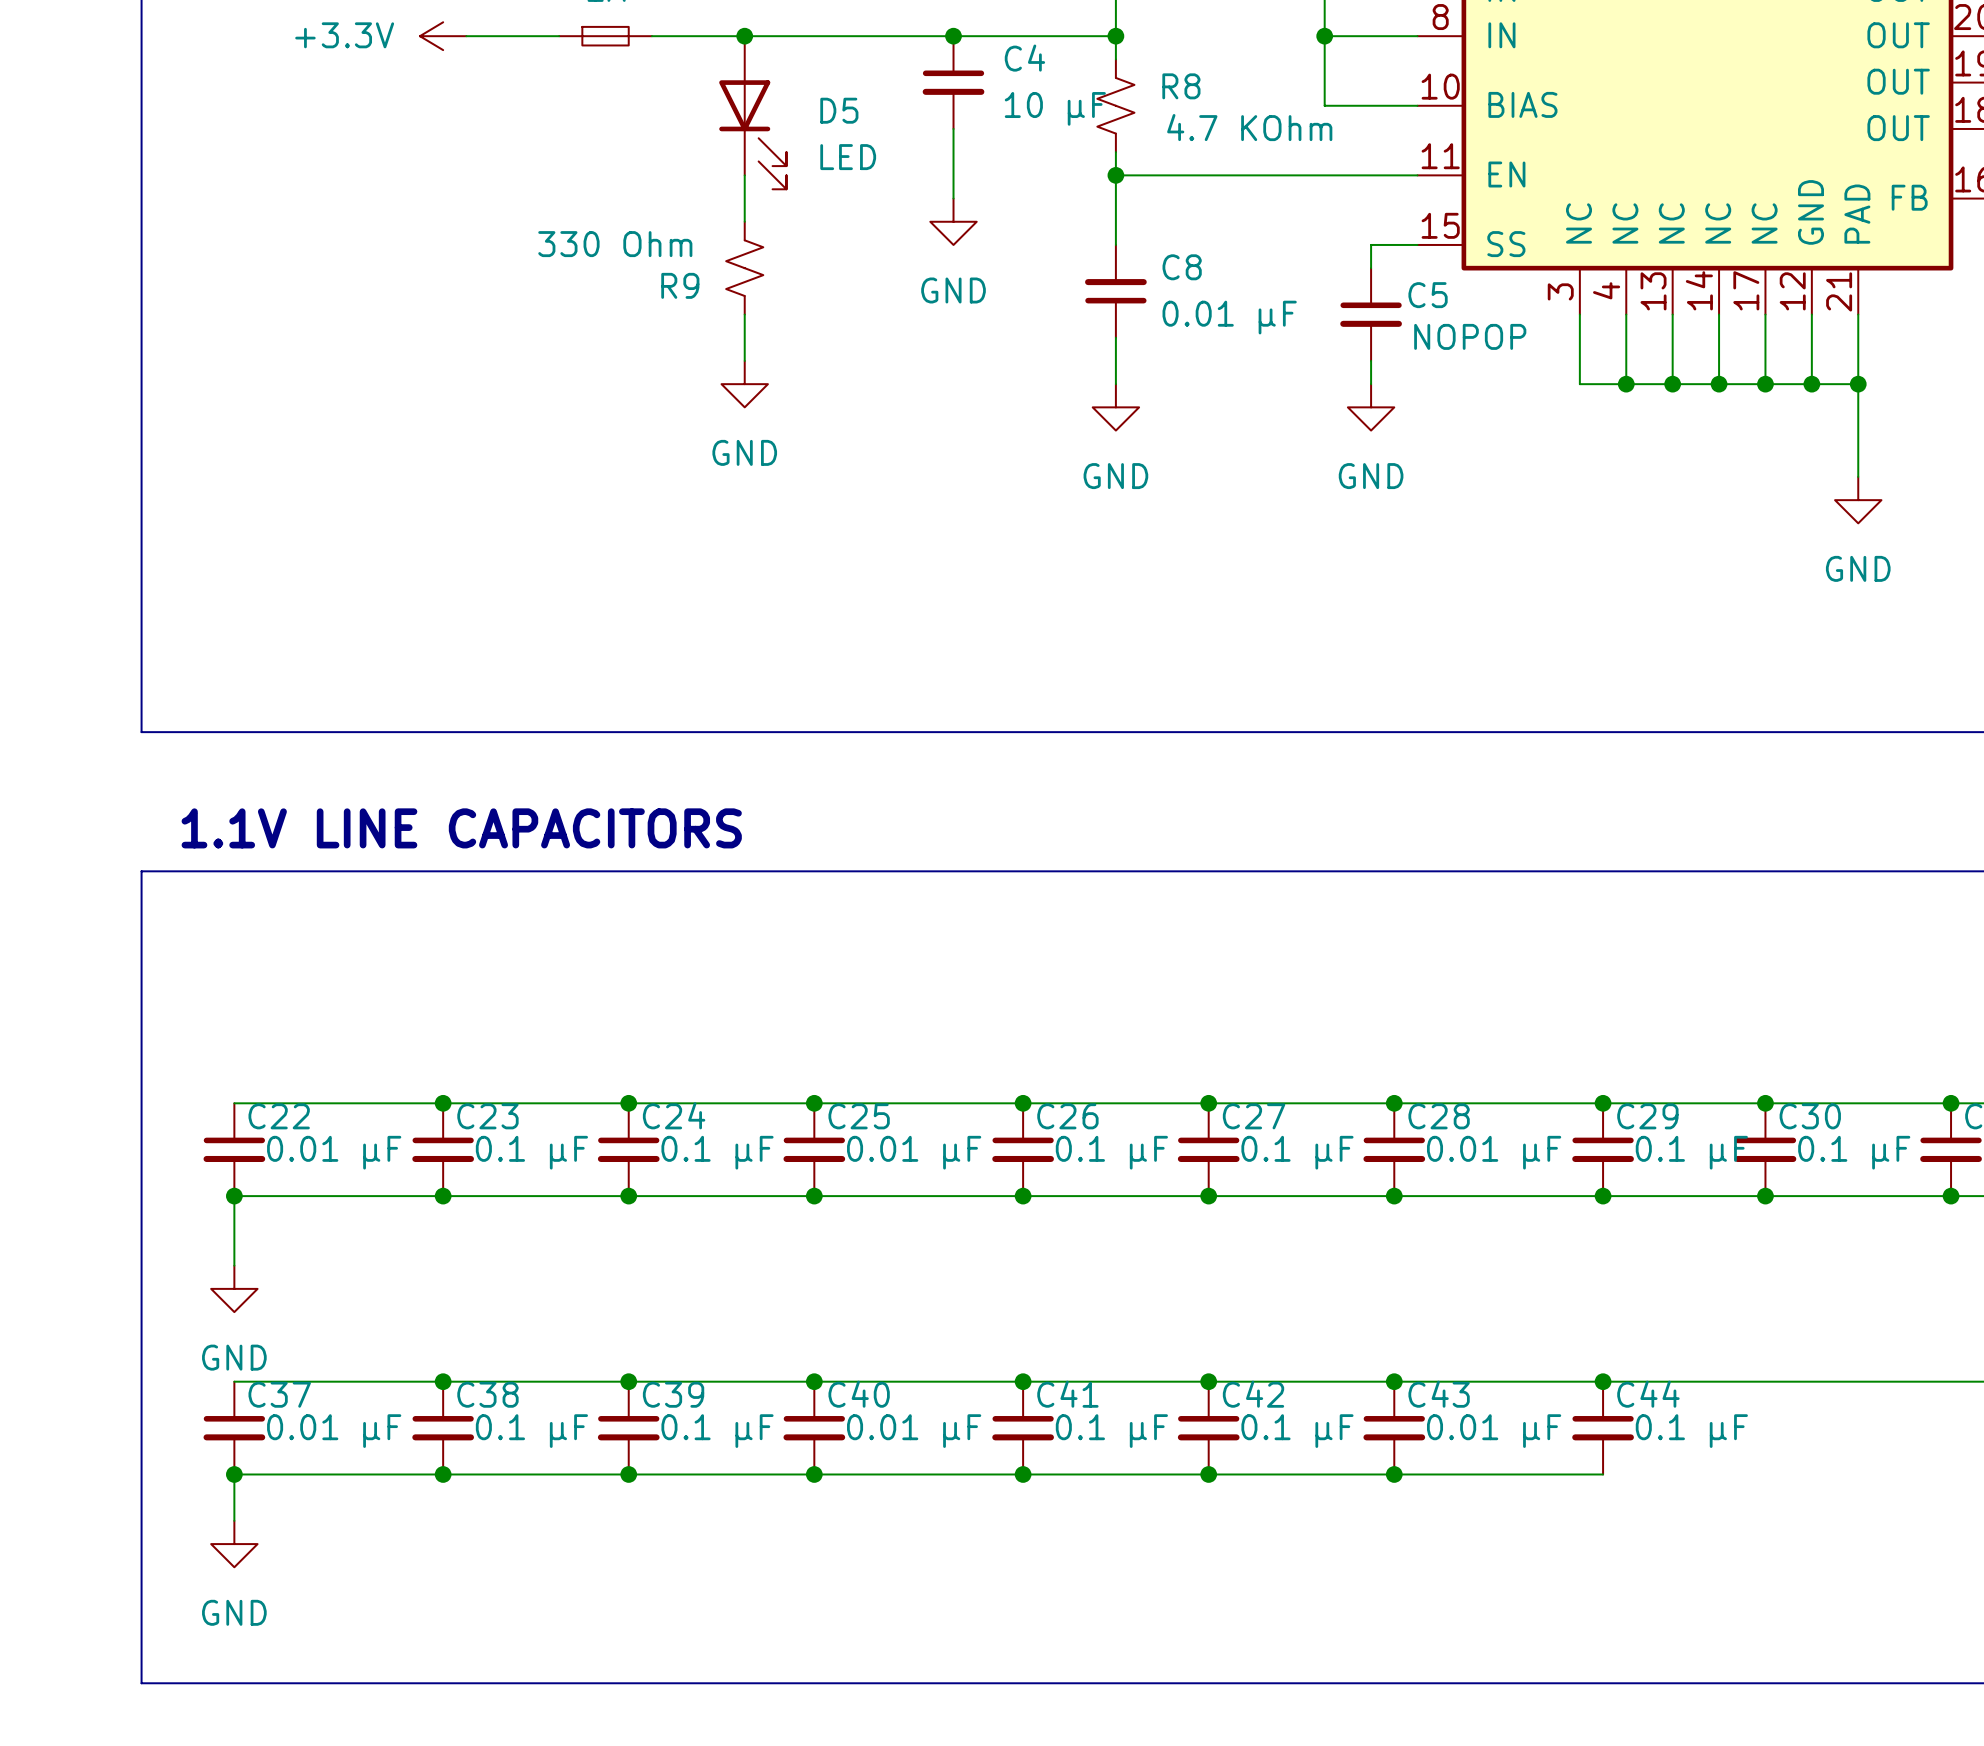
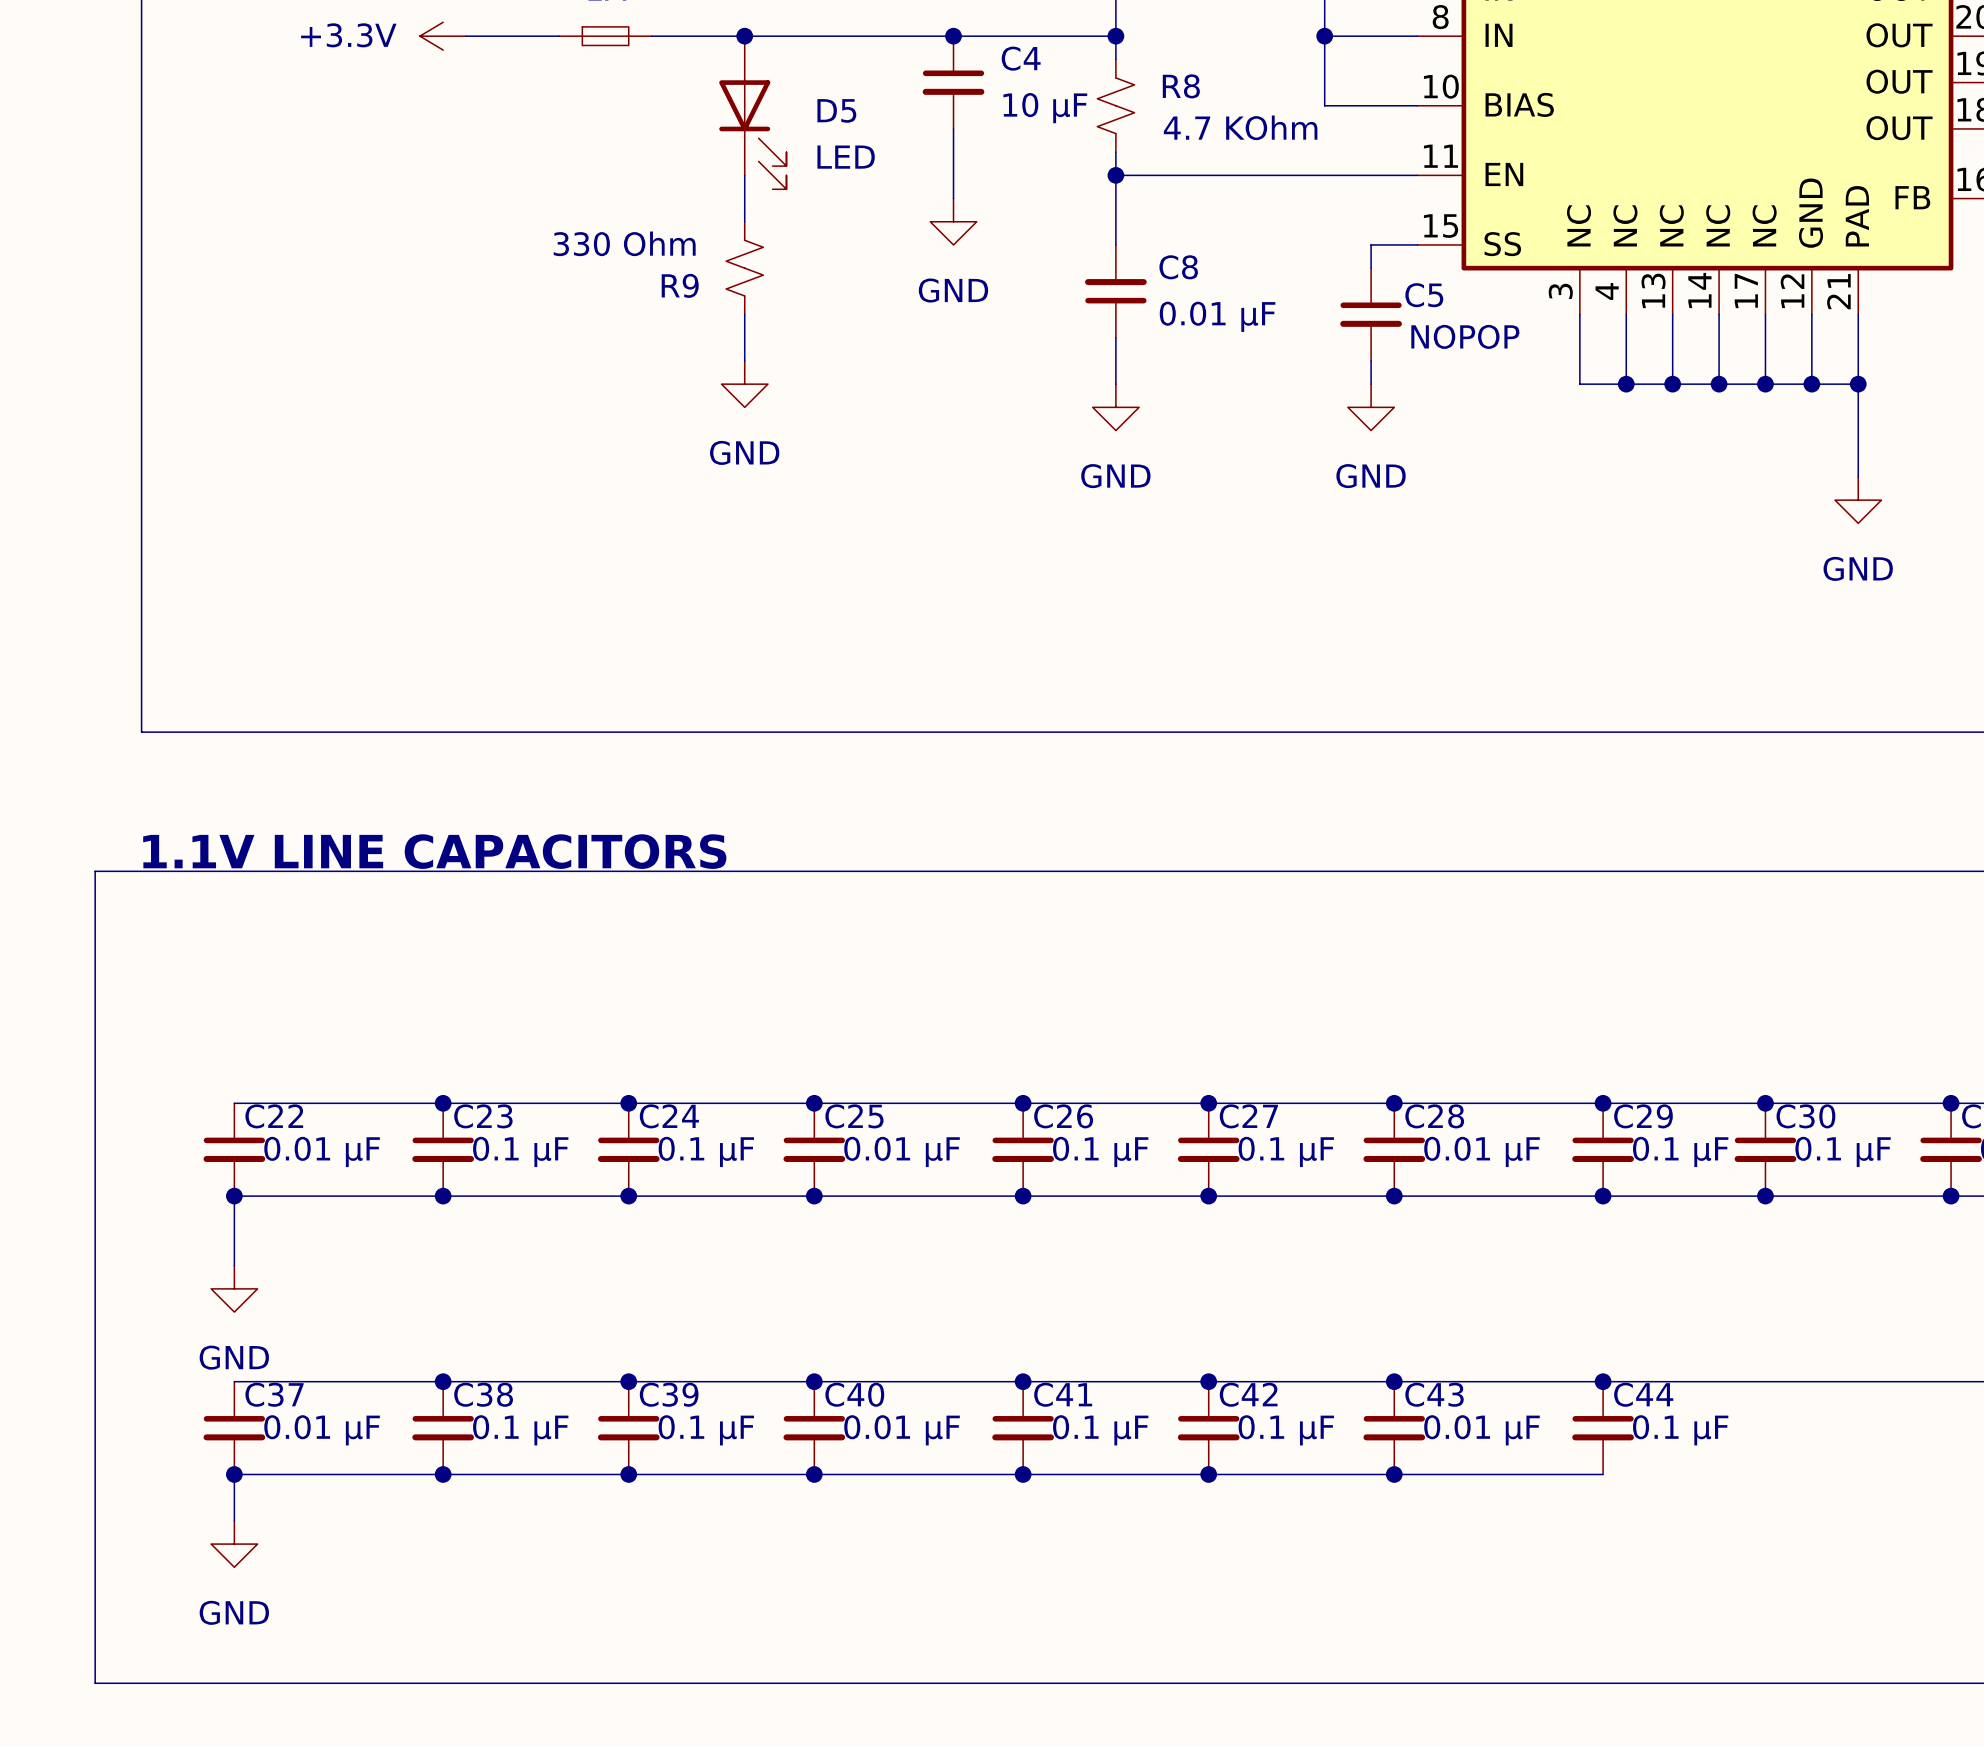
text position: 1.1V LINE CAPACITORS (461, 828) -> 1.1V LINE CAPACITORS (434, 851)
line: (141, 871) (141, 1683) -> (141, 871) (95, 871) (95, 1683) (141, 1683)

